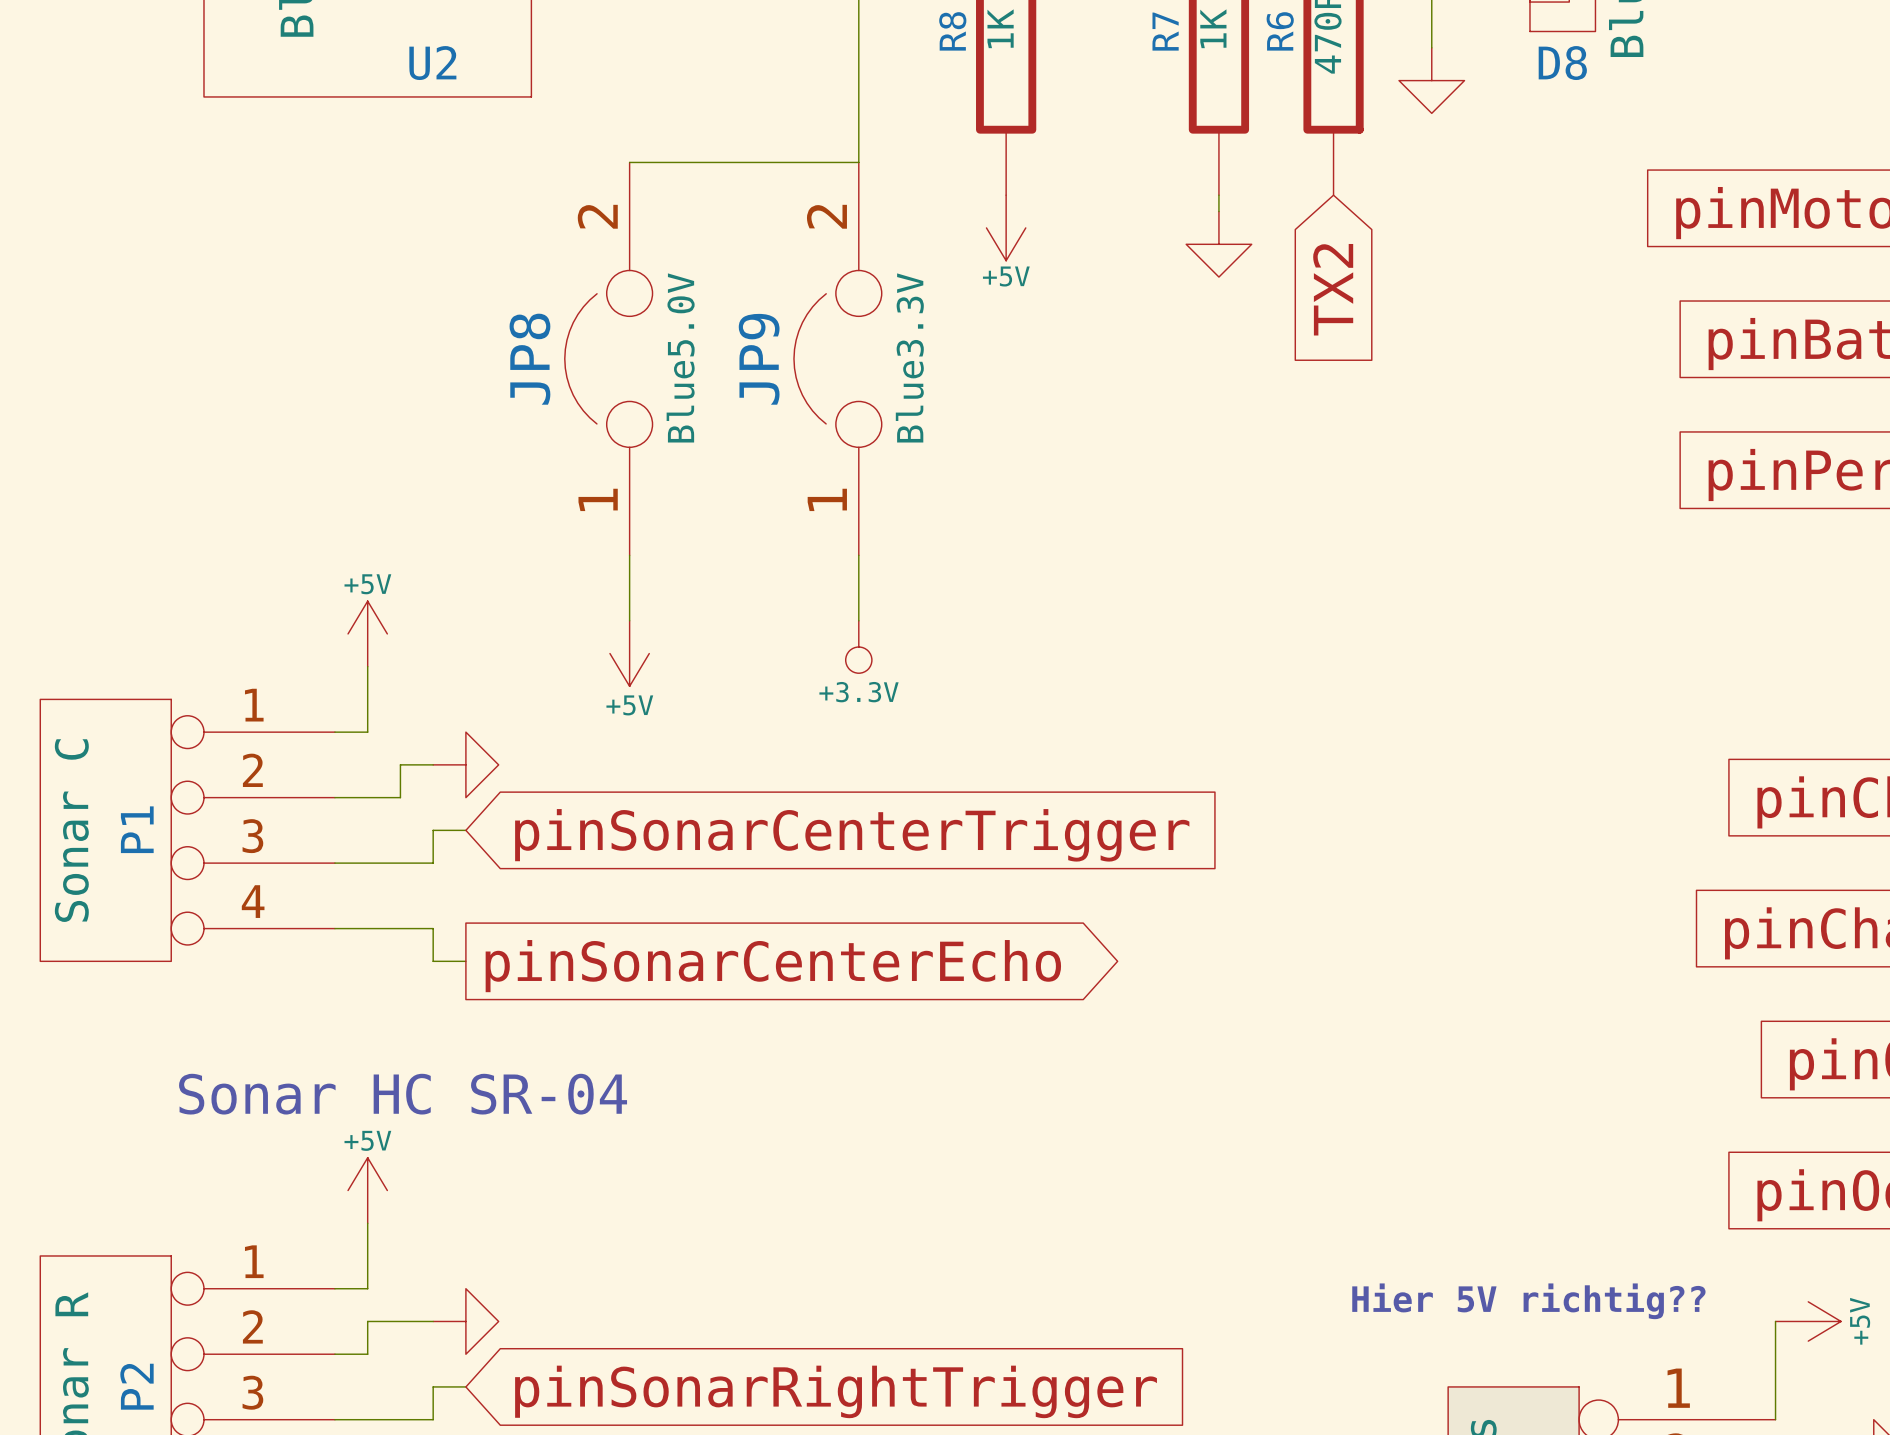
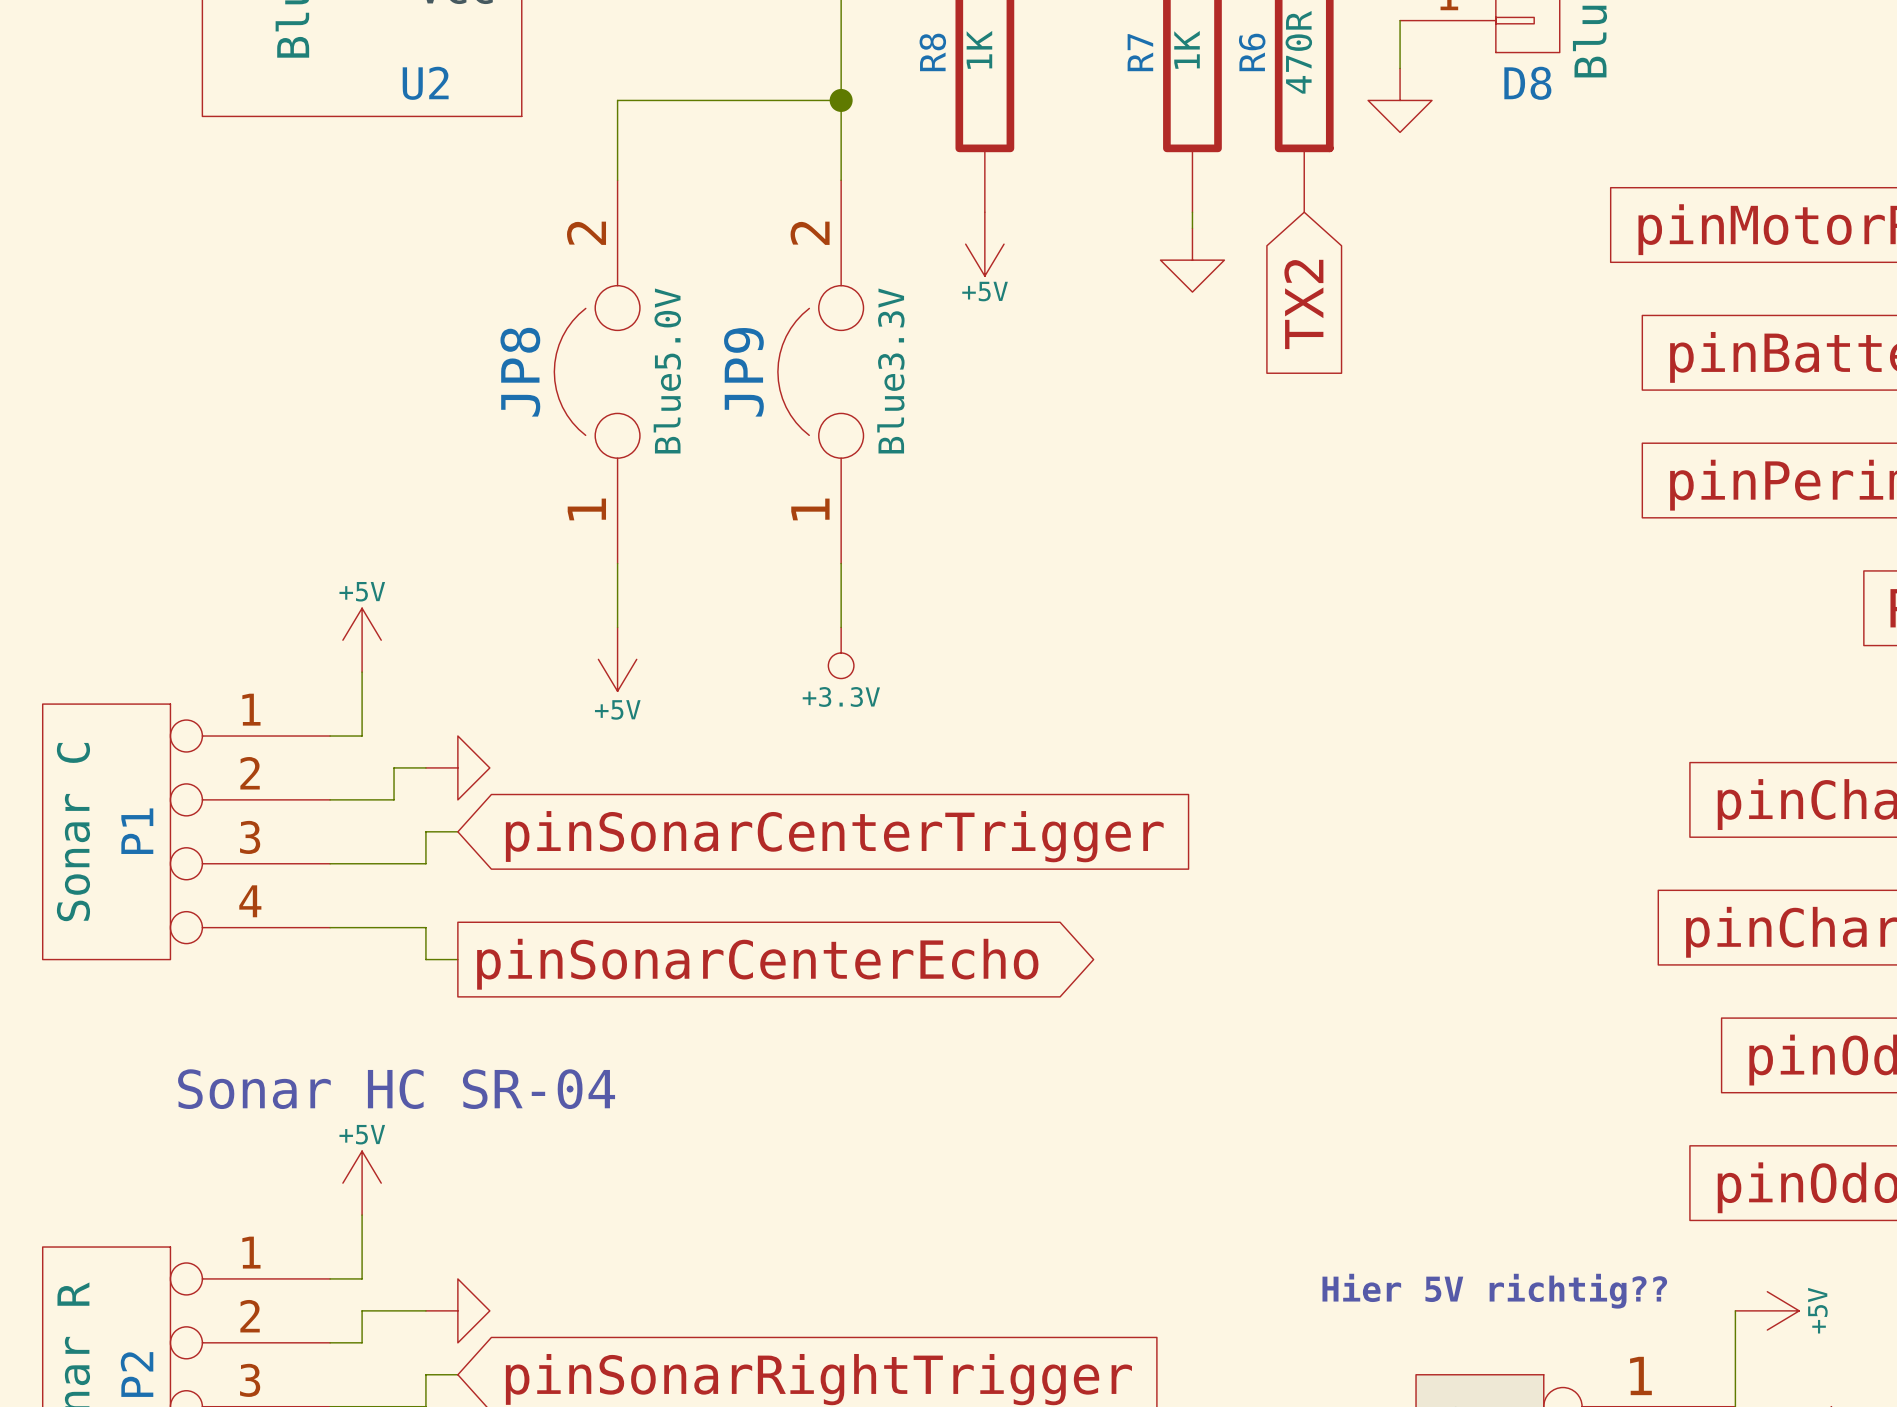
junction: none -> (841, 100)
wire: (629, 162) (858, 162) -> (617, 180) (617, 100) (841, 100)

